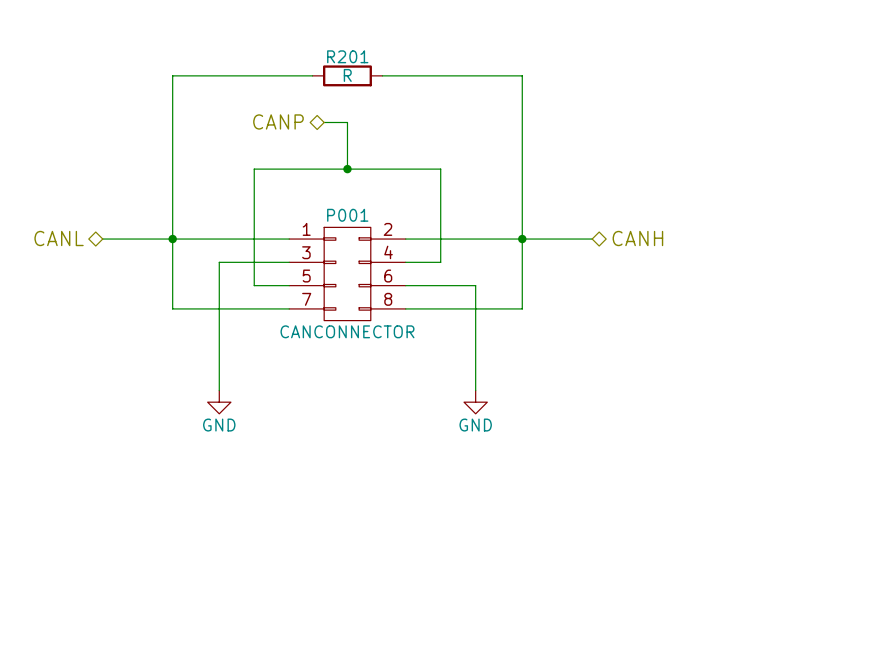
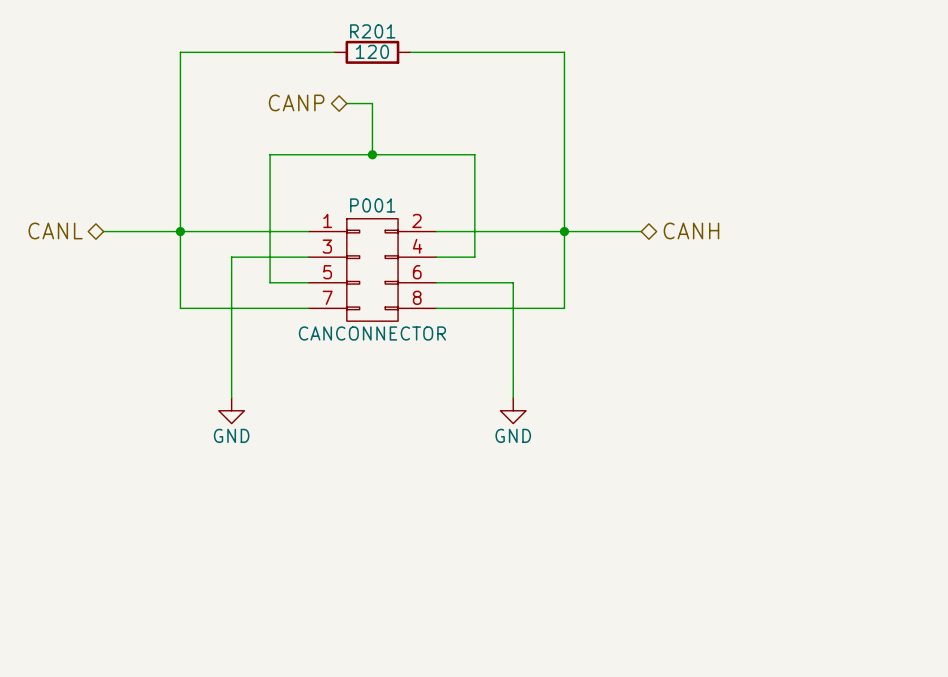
R201 value: R (347, 75) -> 120 (372, 51)

